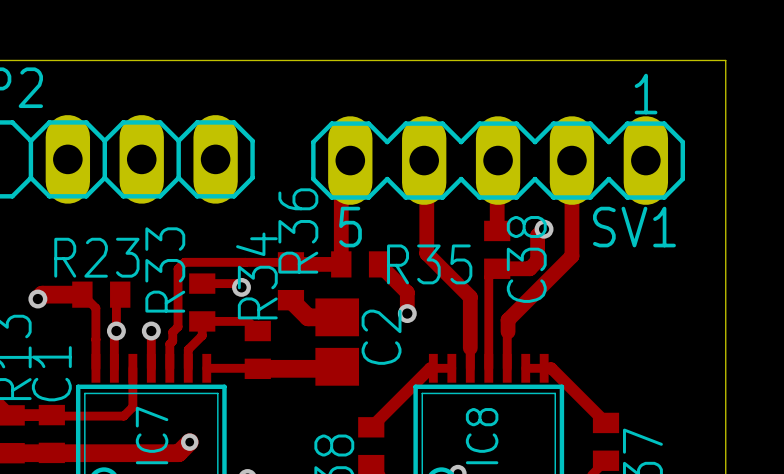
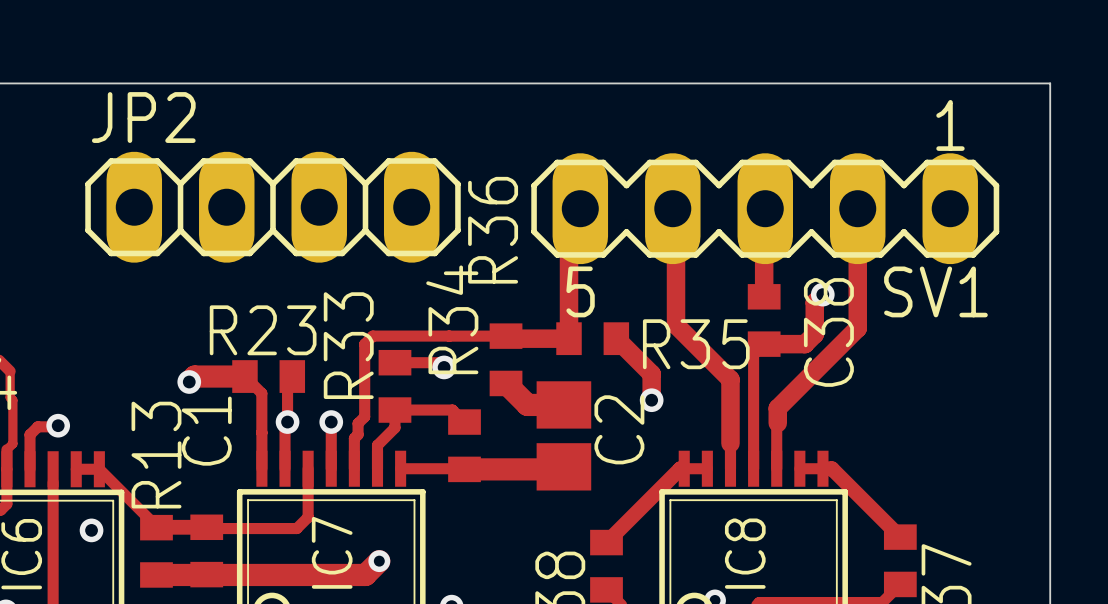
R36 name position: R36 (298, 230) -> R36 (493, 230)
C38 name position: C38 (526, 259) -> C38 (828, 332)
R35 name position: R35 (429, 264) -> R35 (696, 344)
R34 name position: R34 (256, 275) -> R34 (452, 319)
C1 name position: C1 (51, 373) -> C1 (206, 431)

